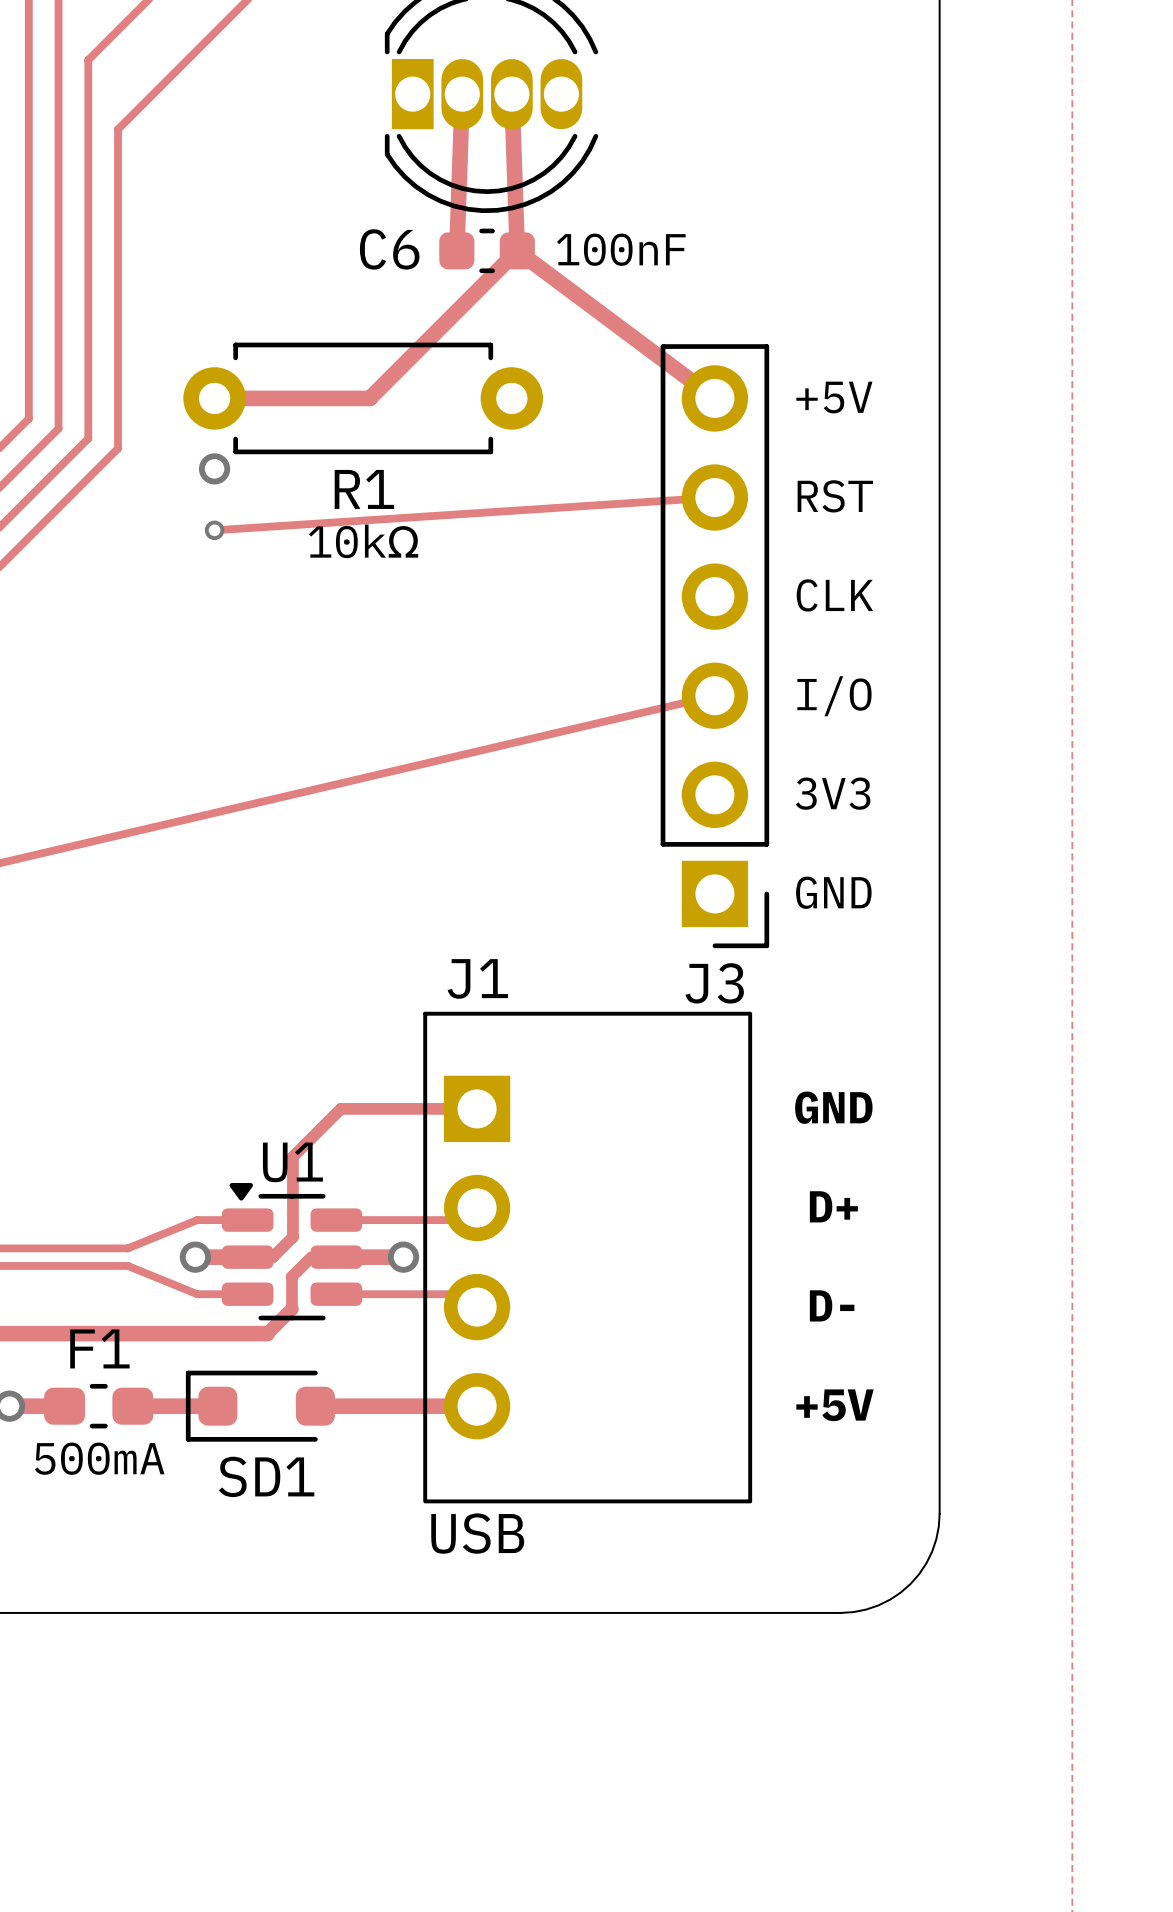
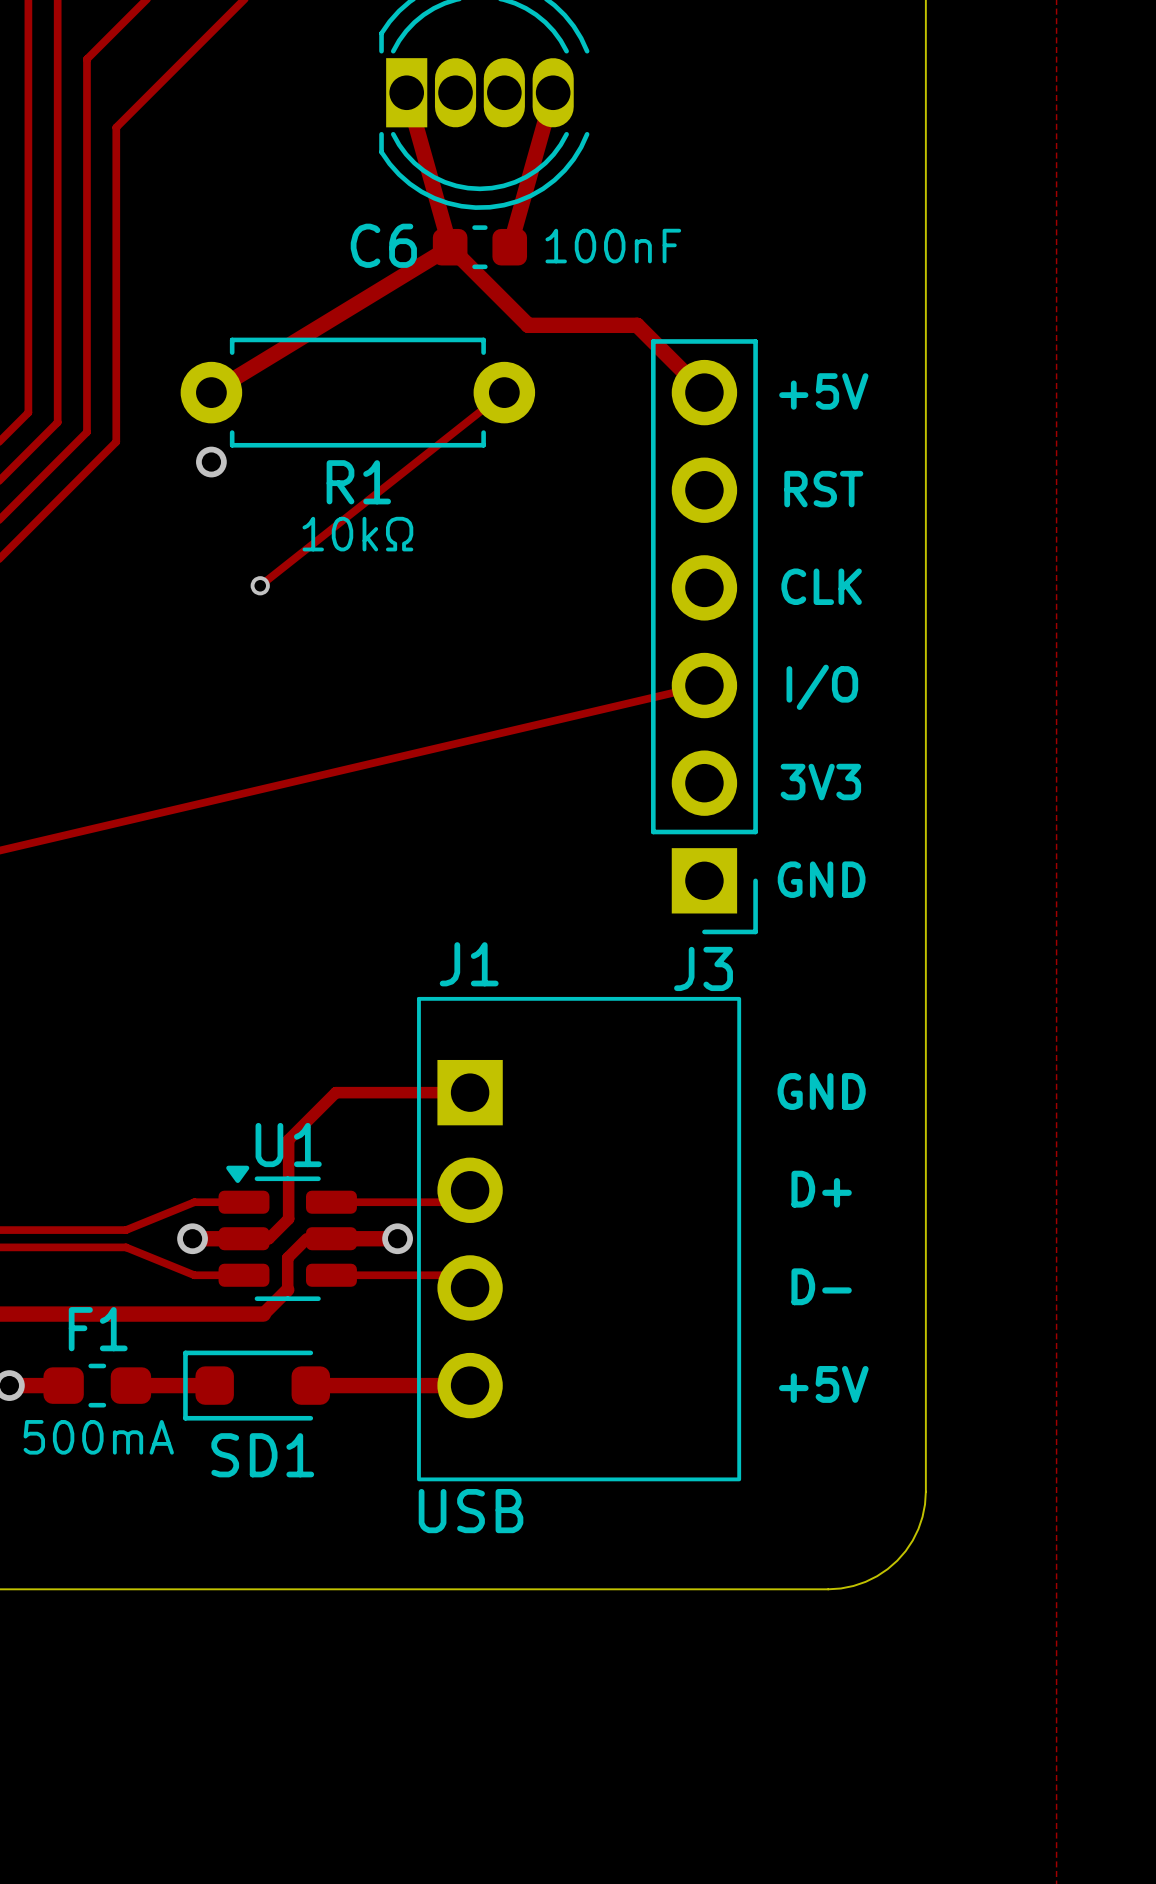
track: (462, 94) (456, 250) -> (406, 92) (450, 247)
track: (511, 94) (517, 250) -> (553, 92) (509, 247)
track: (517, 250) (714, 398) -> (450, 247) (528, 325) (637, 325) (704, 392)
track: (517, 250) (369, 398) (214, 398) -> (450, 247) (211, 392)
track: none -> (504, 392) (260, 585)
track: (714, 497) (214, 530) -> none
via position: (214, 530) -> (260, 585)

